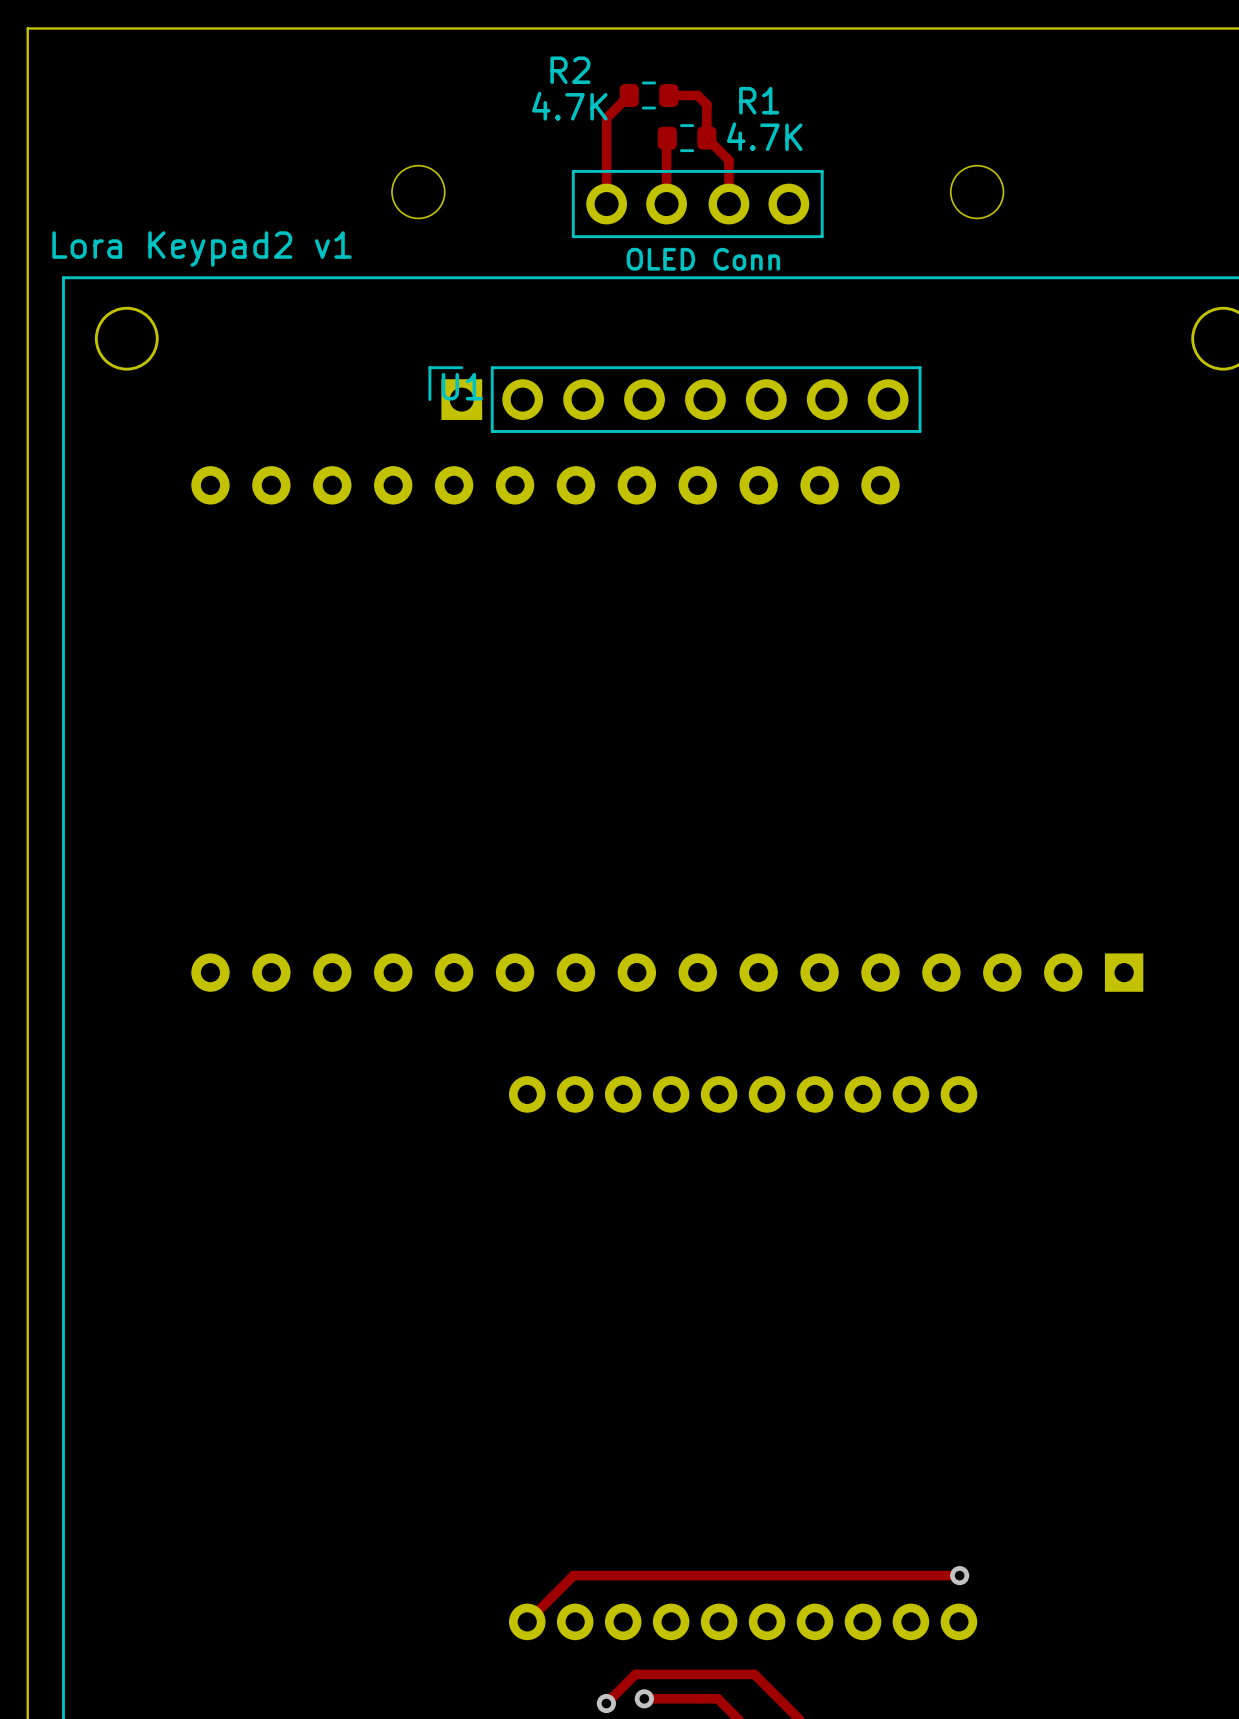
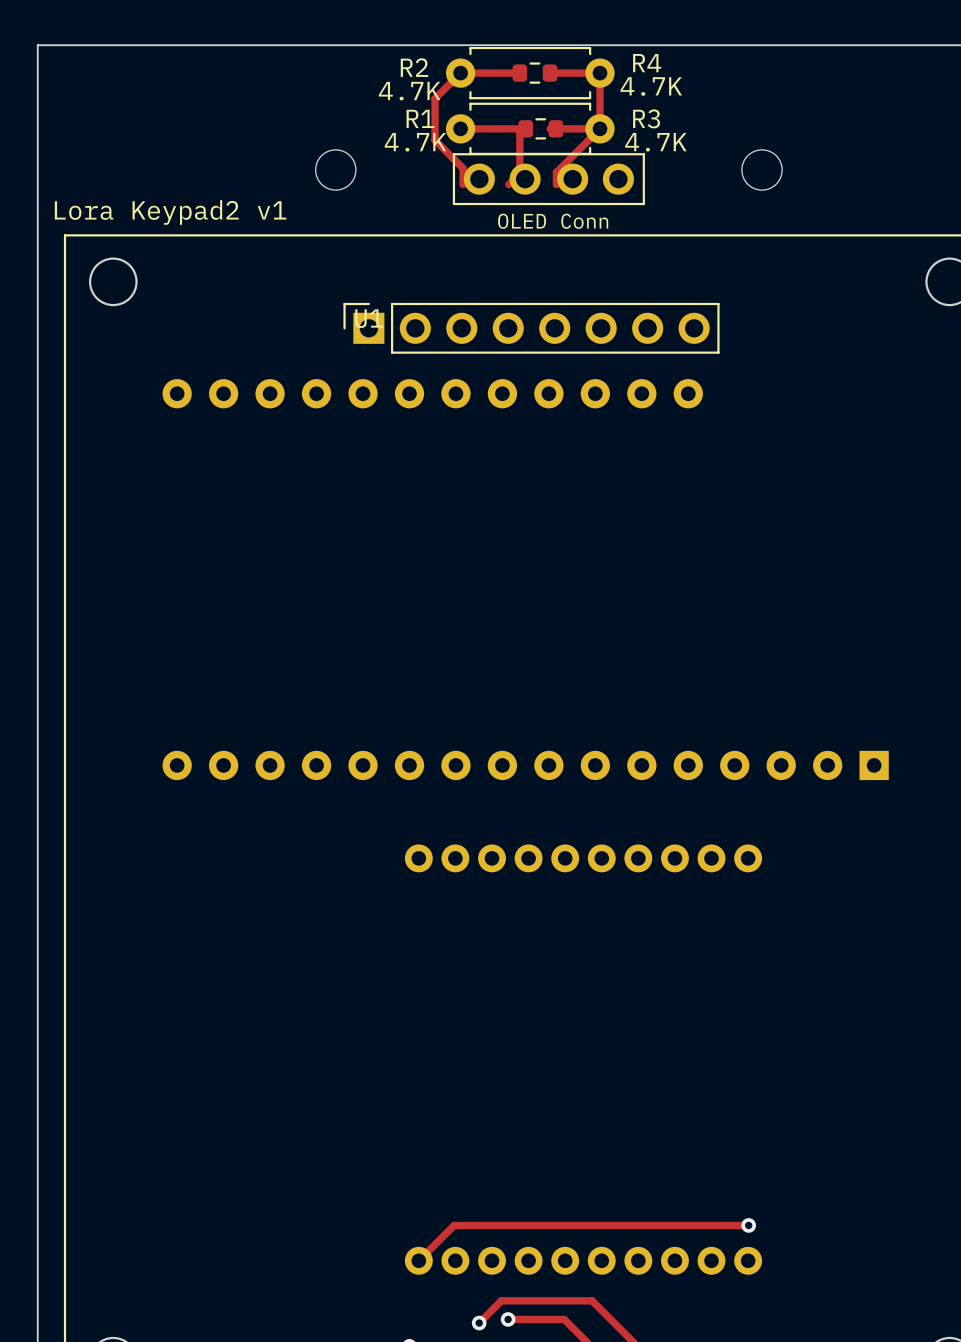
track: none -> (519, 73) (460, 73) (435, 98) (435, 140) (463, 168) (463, 184)
R4: none -> 4.7K (530, 73)
track: none -> (550, 73) (600, 73) (600, 128)
R2 name position: R2 (570, 70) -> R2 (414, 67)
track: (629, 95) (606, 118) (606, 204) -> none
R2 position: (649, 95) -> (534, 73)
track: (668, 95) (697, 95) (706, 104) (706, 138) (728, 160) (728, 204) -> none
R1 name position: R1 (759, 100) -> R1 (420, 118)
R2 value position: 4.7K (569, 106) -> 4.7K (409, 91)
R1 value position: 4.7K (764, 136) -> 4.7K (415, 142)
track: none -> (460, 128) (519, 128) (519, 173) (508, 184)
track: (667, 138) (666, 204) -> none
R3: none -> 4.7K (530, 128)
track: none -> (550, 128) (600, 128)
track: none -> (600, 128) (556, 172) (556, 184)

